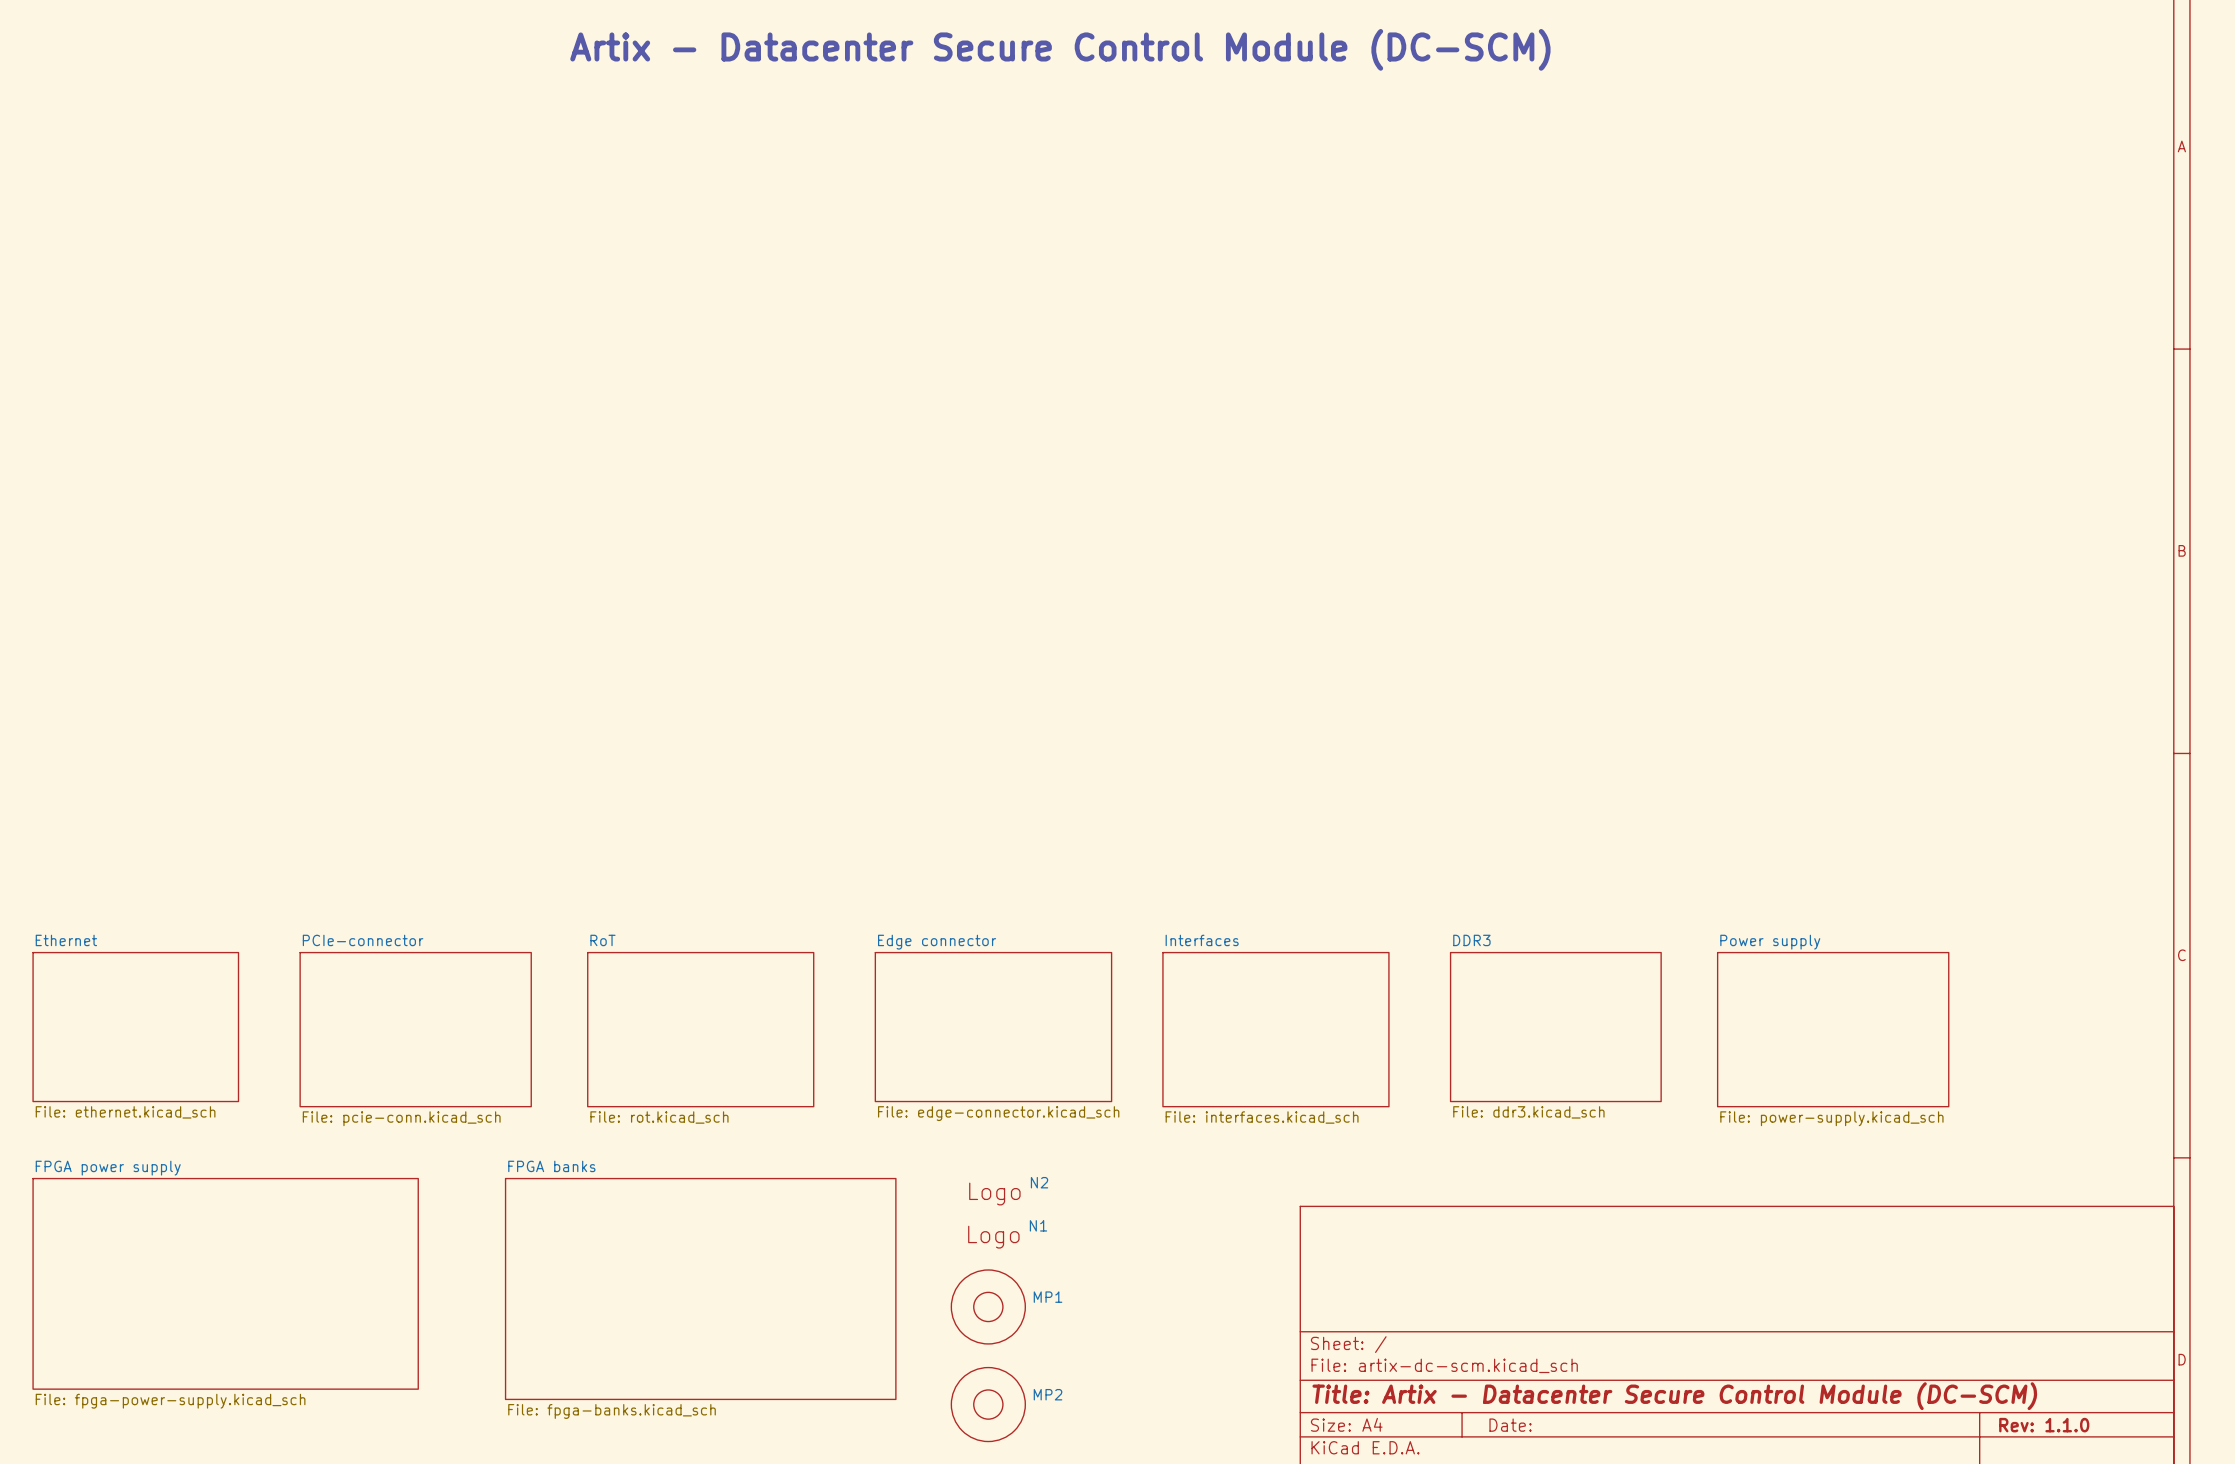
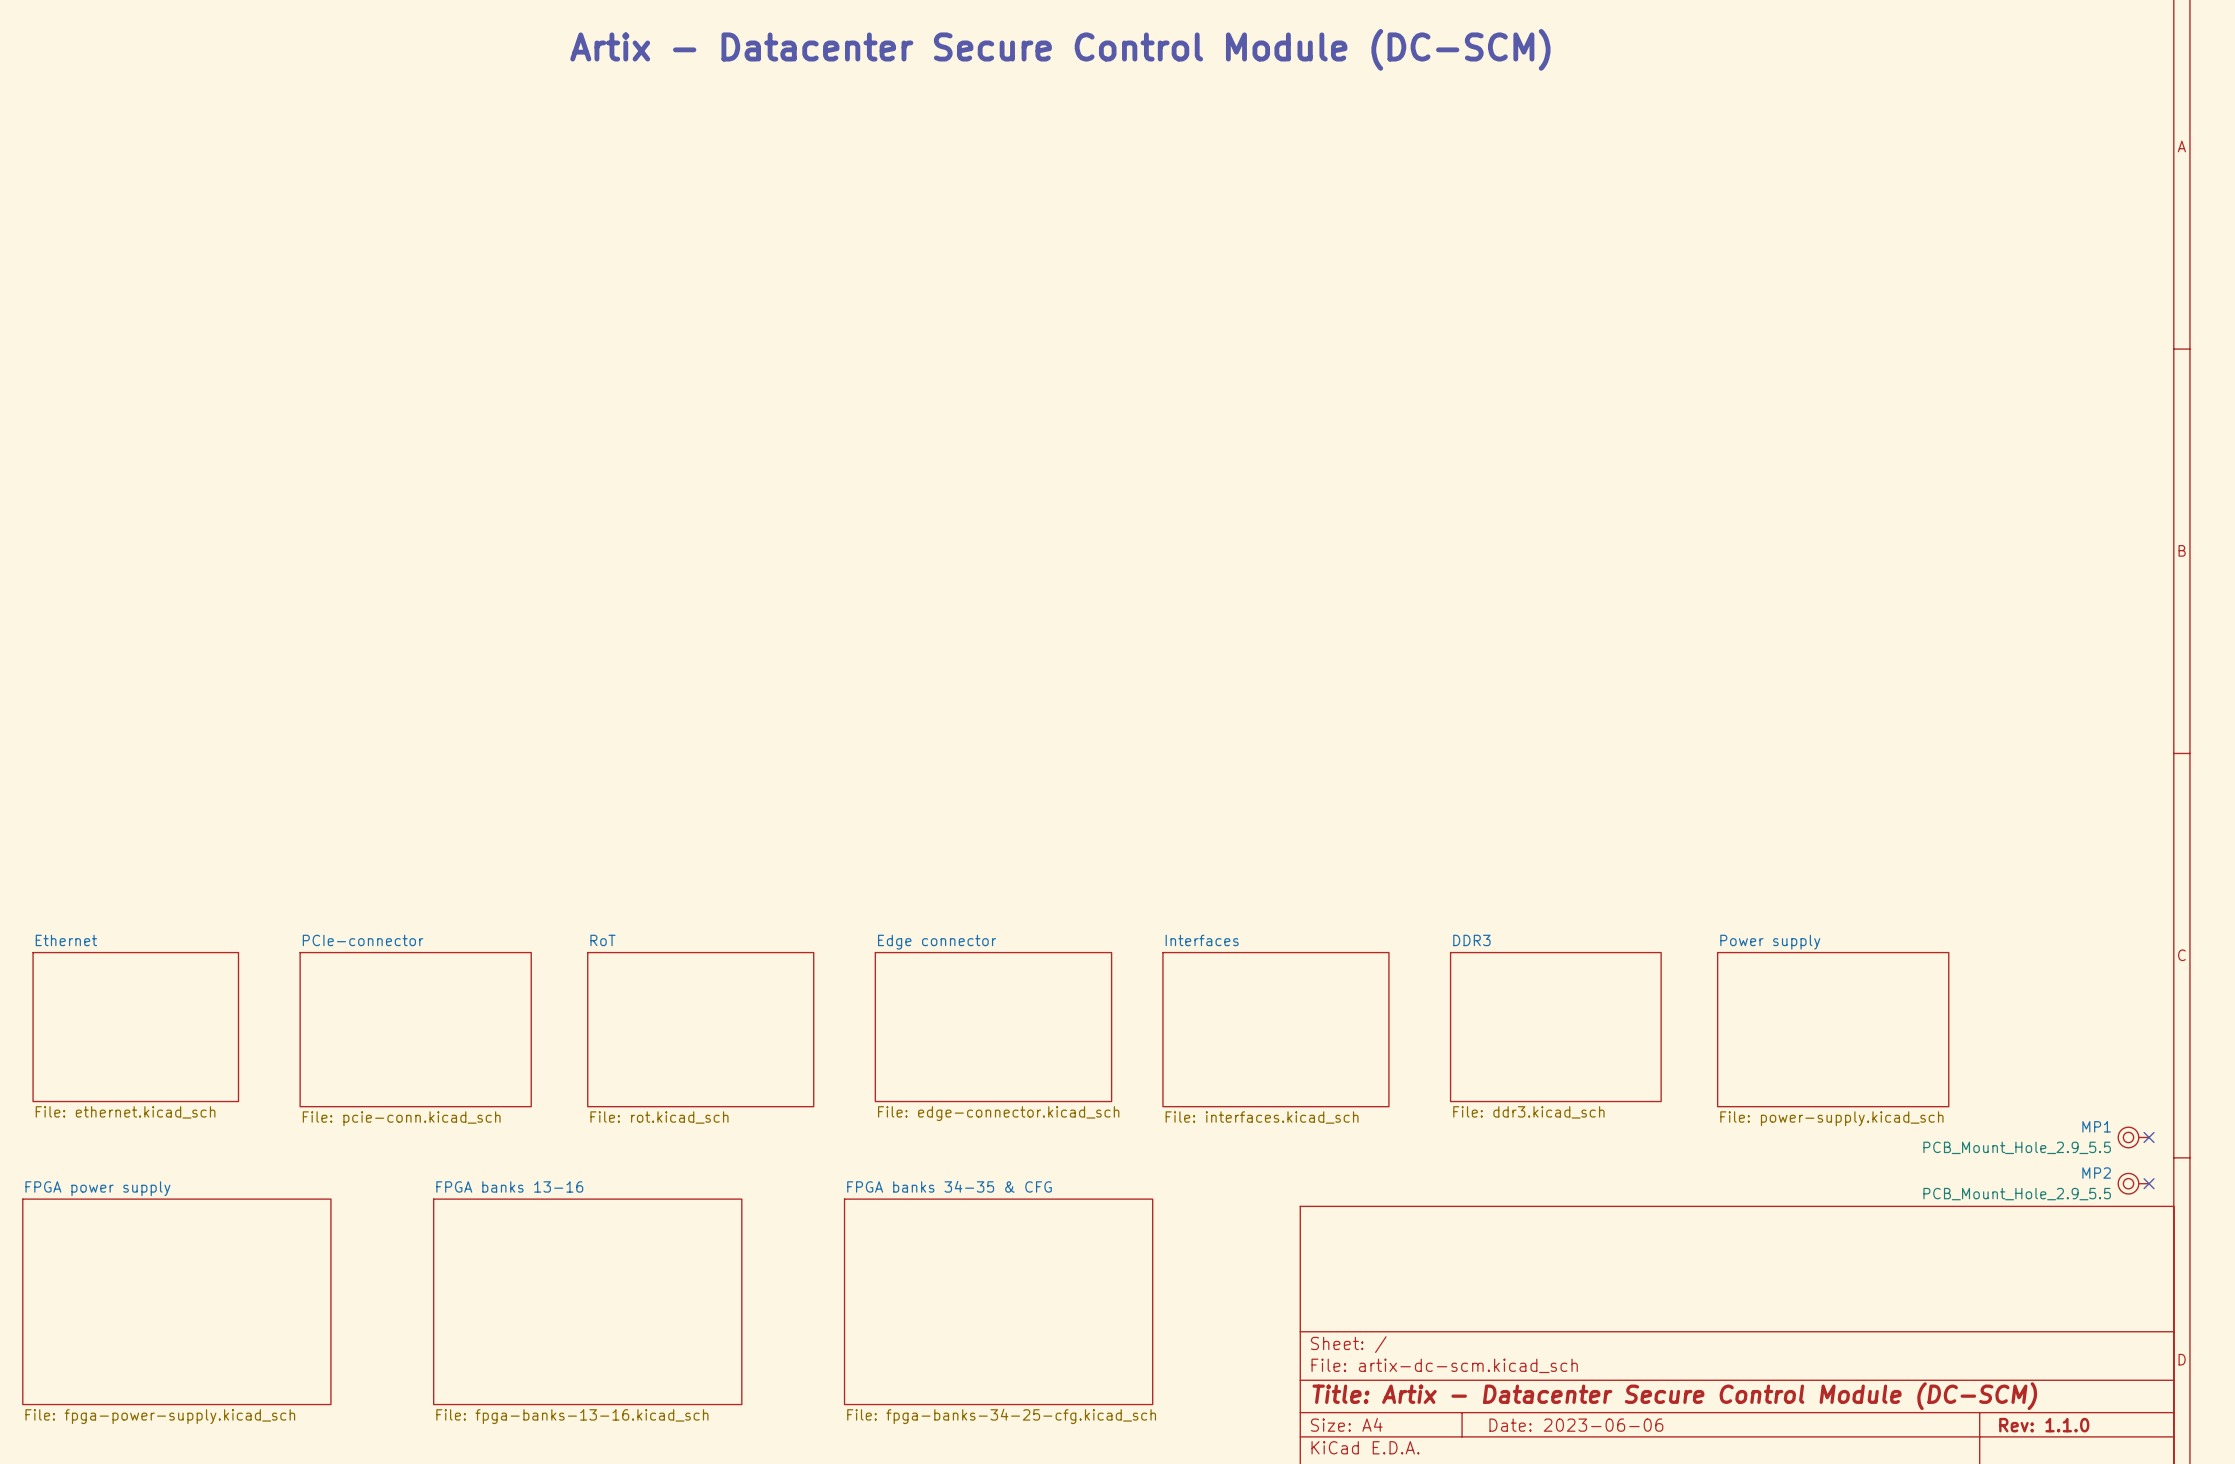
no-connect mark: none -> (2149, 1137)
MP1 value: none -> PCB_Mount_Hole_2.9_5.5 (2017, 1147)
no-connect mark: none -> (2149, 1183)
N2: (1008, 1191) -> none
MP2 value: none -> PCB_Mount_Hole_2.9_5.5 (2017, 1194)
N1: (1007, 1234) -> none
MP1 symbol: [951, 1269, 1026, 1344] -> [2118, 1127, 2150, 1148]
sheet FPGA power supply: File: fpga-power-supply.kicad_sch (225, 1283) -> none
sheet FPGA banks: File: fpga-banks.kicad_sch (700, 1288) -> none
MP1 name position: MP1 (1048, 1297) -> MP1 (2096, 1126)
sheet FPGA power supply: none -> File: fpga-power-supply.kicad_sch (176, 1301)
sheet FPGA banks 13-16: none -> File: fpga-banks-13-16.kicad_sch (587, 1301)
sheet FPGA banks 34-35 & CFG: none -> File: fpga-banks-34-25-cfg.kicad_sch (998, 1301)
MP2 symbol: [951, 1367, 1026, 1442] -> [2118, 1173, 2150, 1194]
MP2 name position: MP2 (1048, 1394) -> MP2 (2096, 1173)
title block: Date: (1510, 1425) -> Date: 2023-06-06 (1576, 1425)

